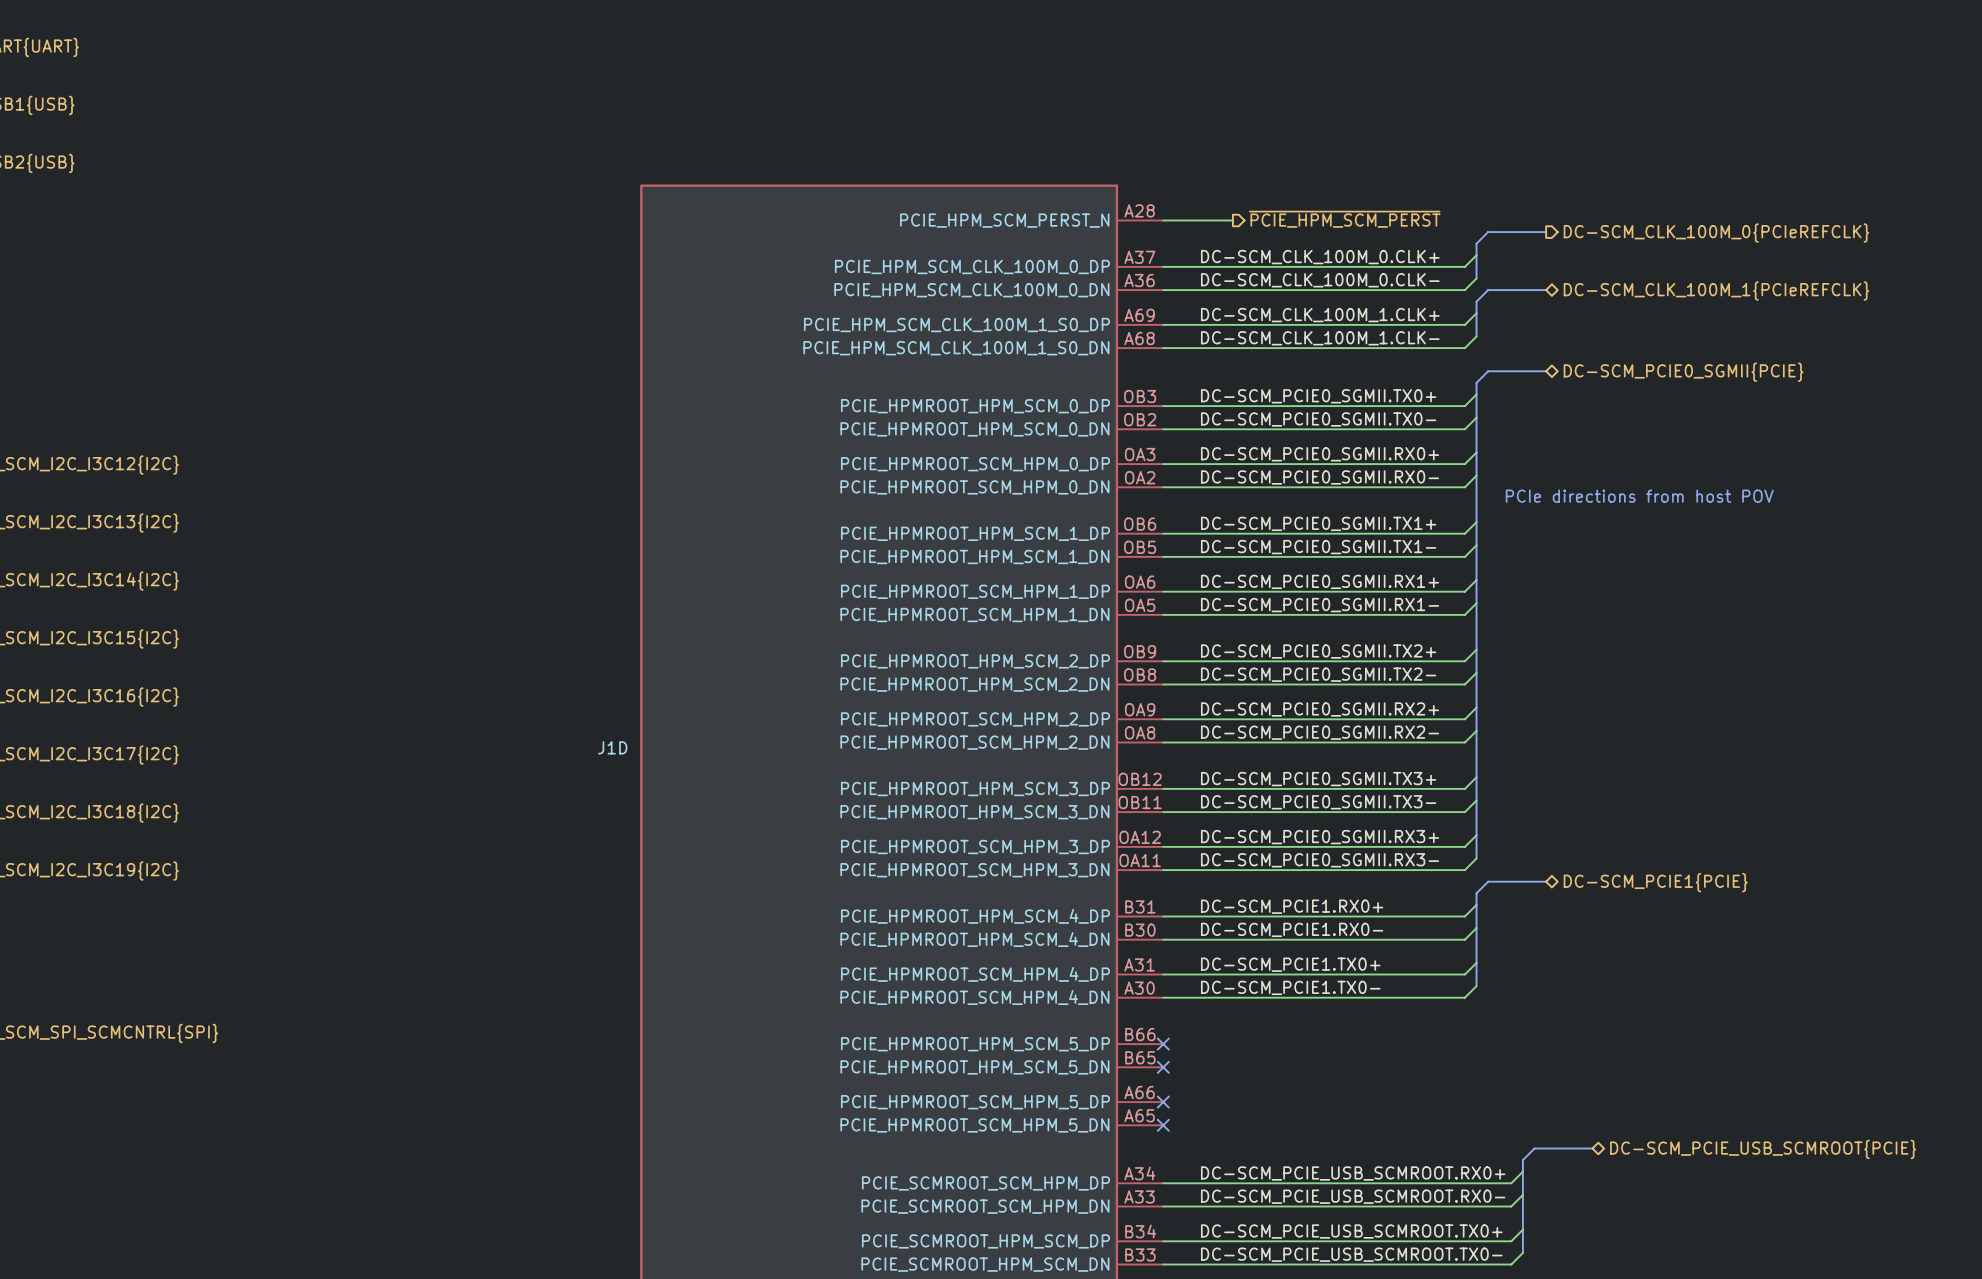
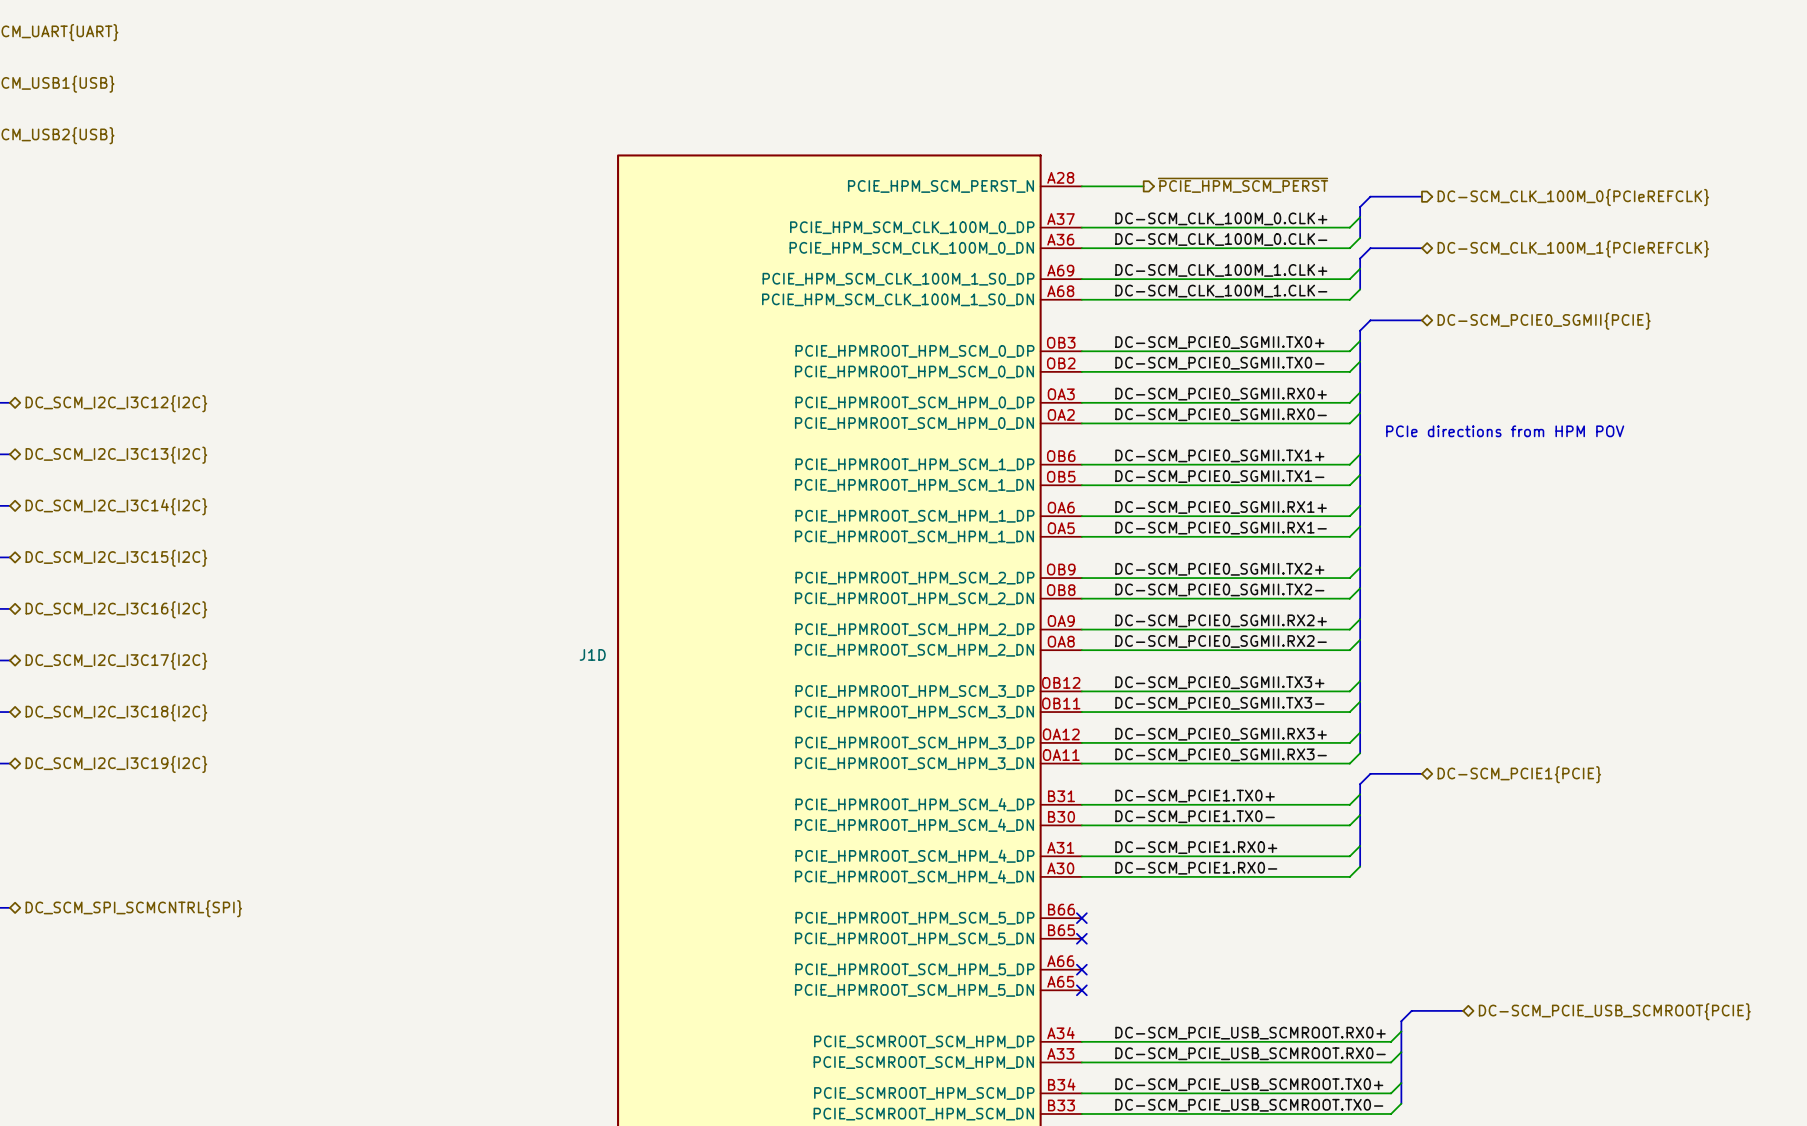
text: PCIe directions from host POV (1639, 496) -> PCIe directions from HPM POV (1505, 431)
label: DC-SCM_PCIE1.RX0+ (1292, 906) -> DC-SCM_PCIE1.TX0+ (1195, 796)
label: DC-SCM_PCIE1.RX0- (1292, 929) -> DC-SCM_PCIE1.TX0- (1195, 816)
label: DC-SCM_PCIE1.TX0+ (1290, 964) -> DC-SCM_PCIE1.RX0+ (1196, 847)
label: DC-SCM_PCIE1.TX0- (1290, 987) -> DC-SCM_PCIE1.RX0- (1196, 868)

